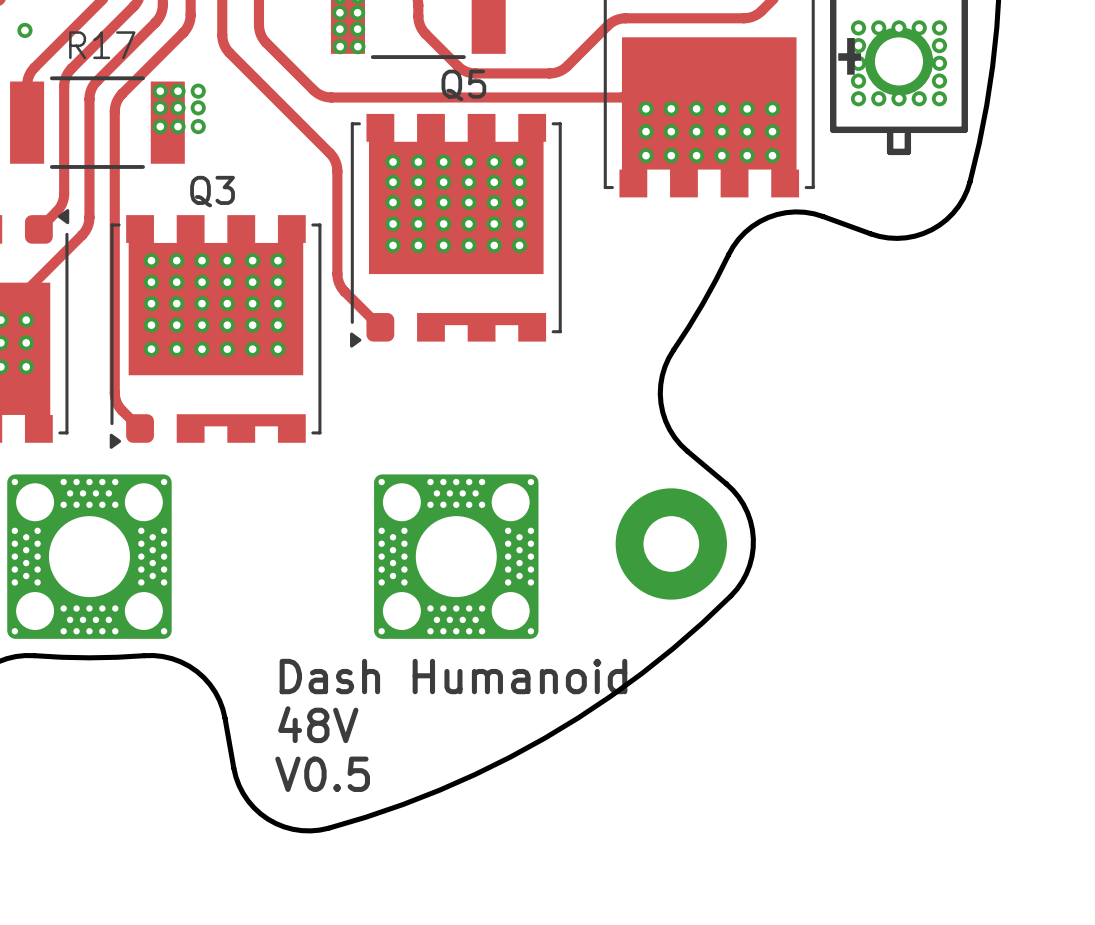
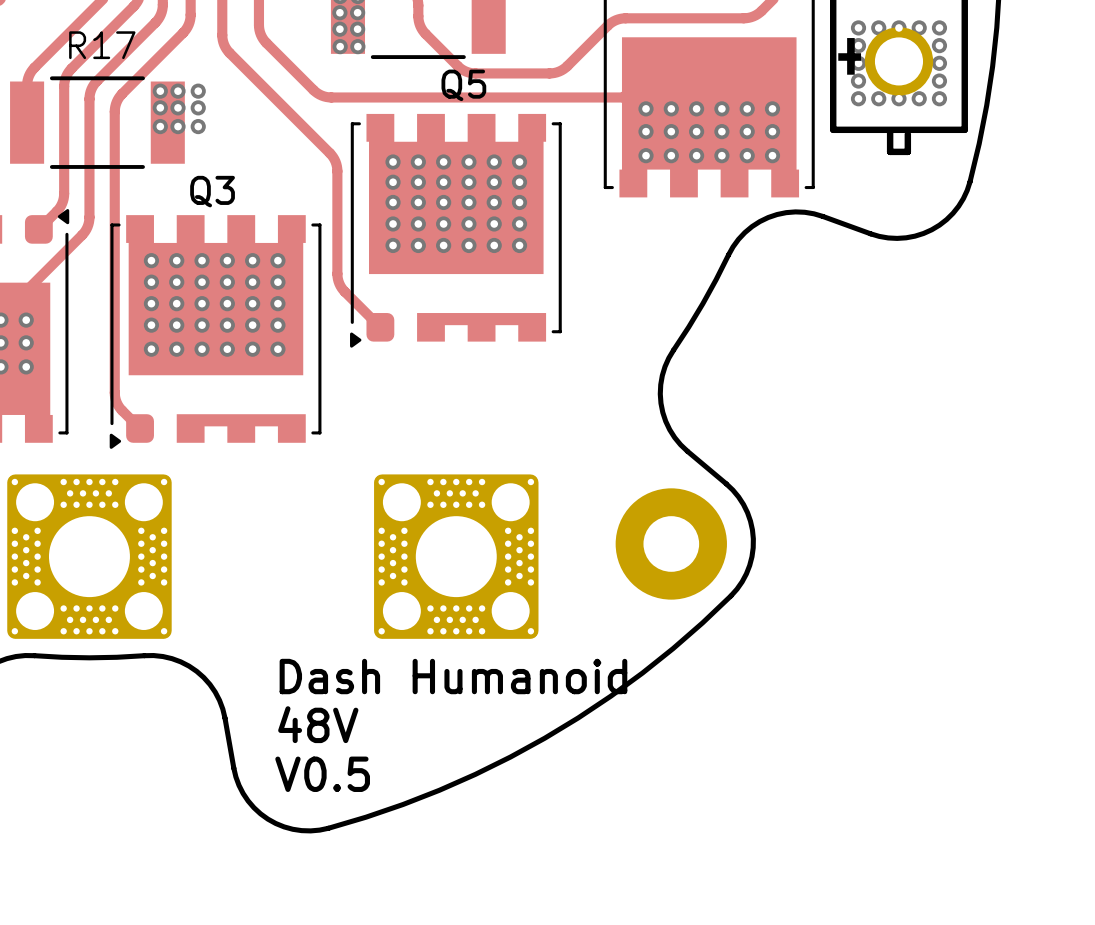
via: (24, 30) -> none

